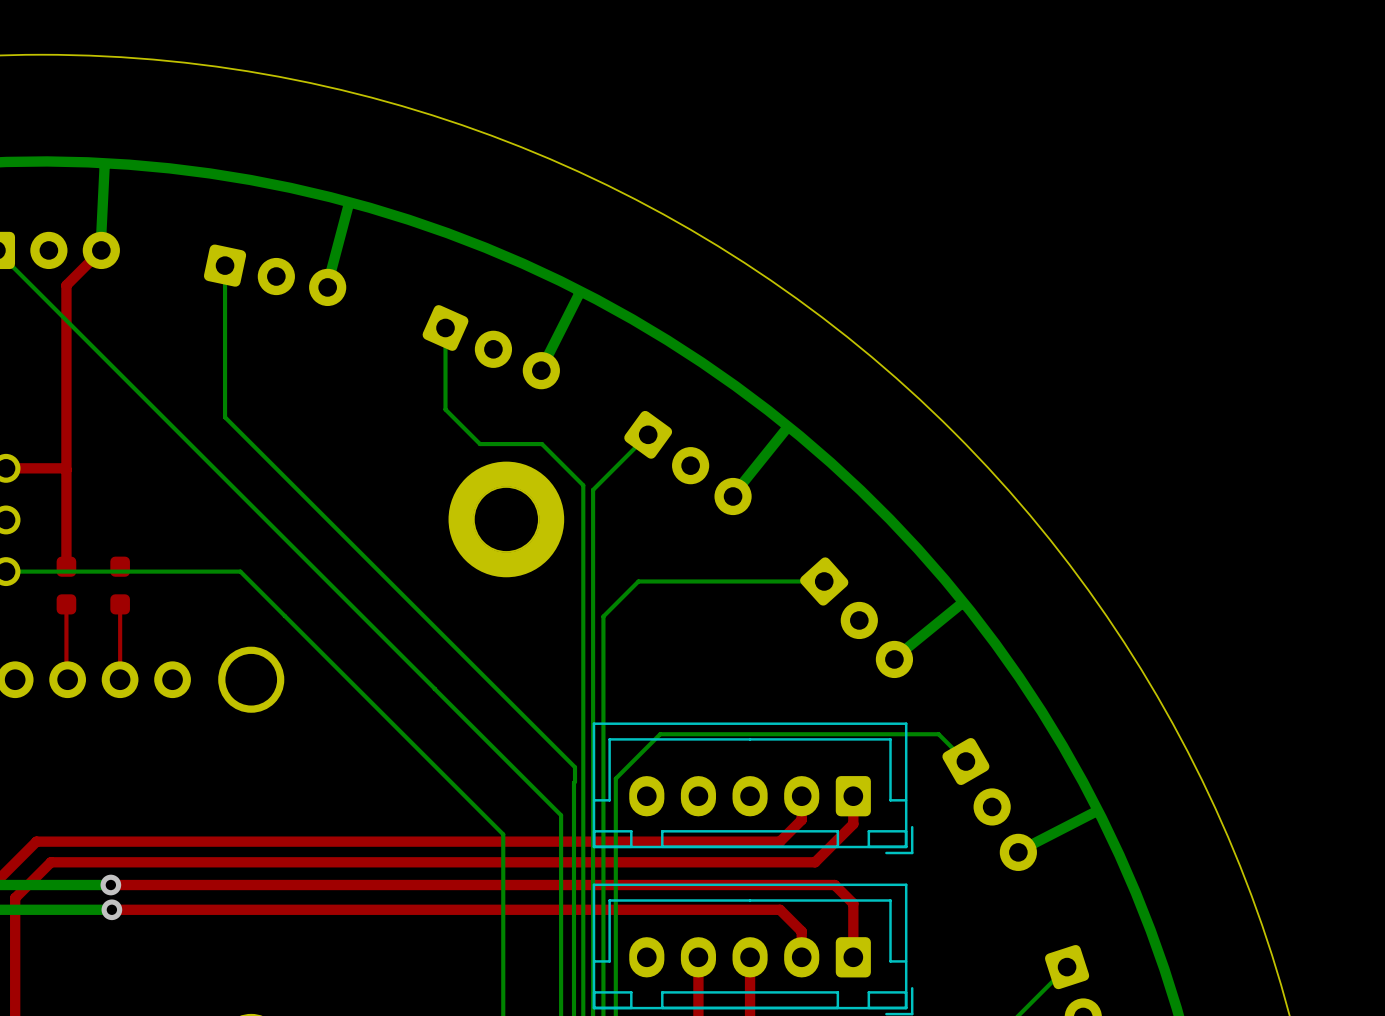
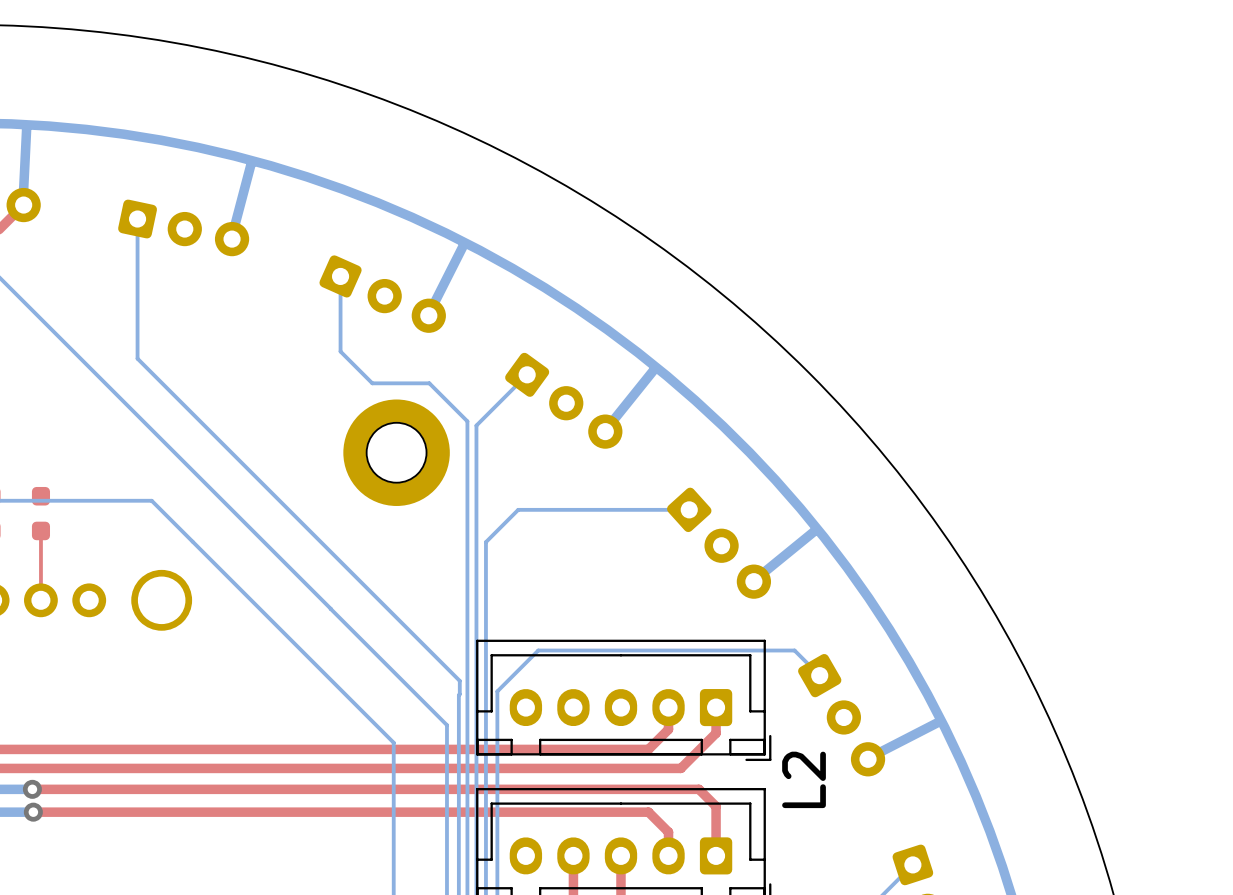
text: none -> L2 (804, 779)

